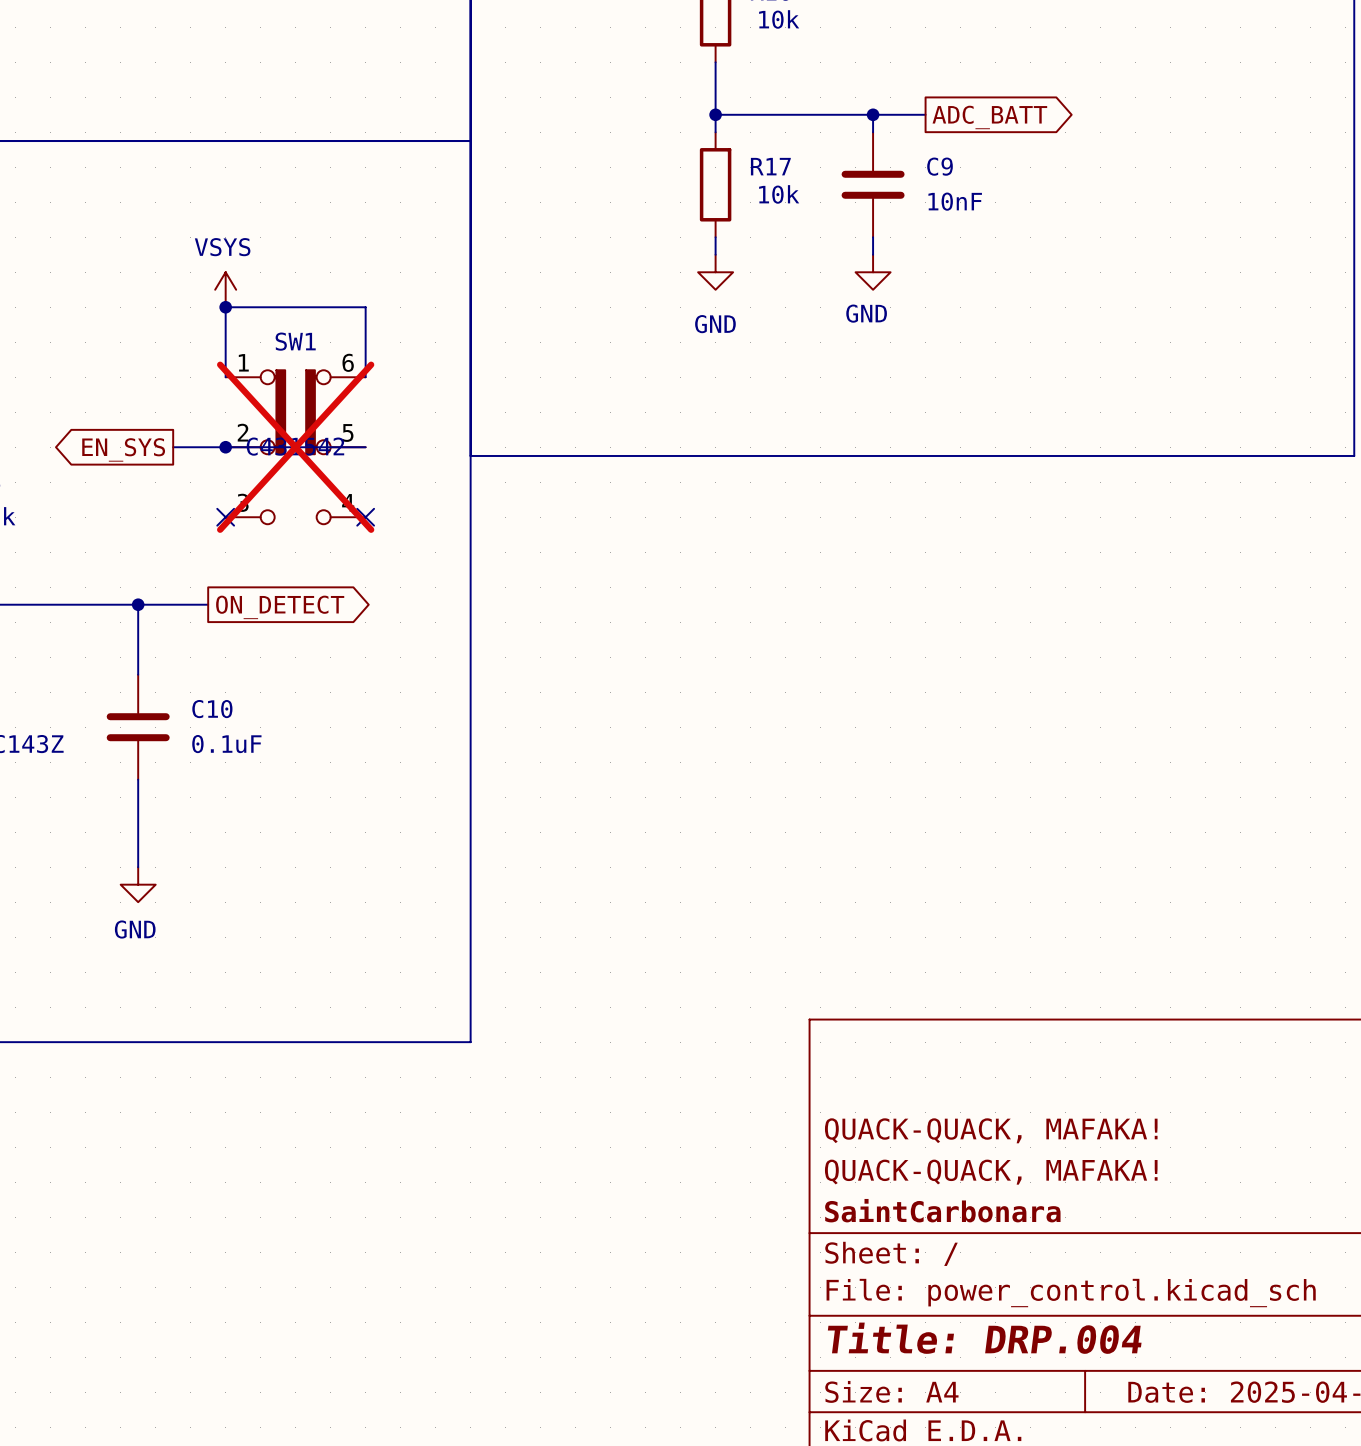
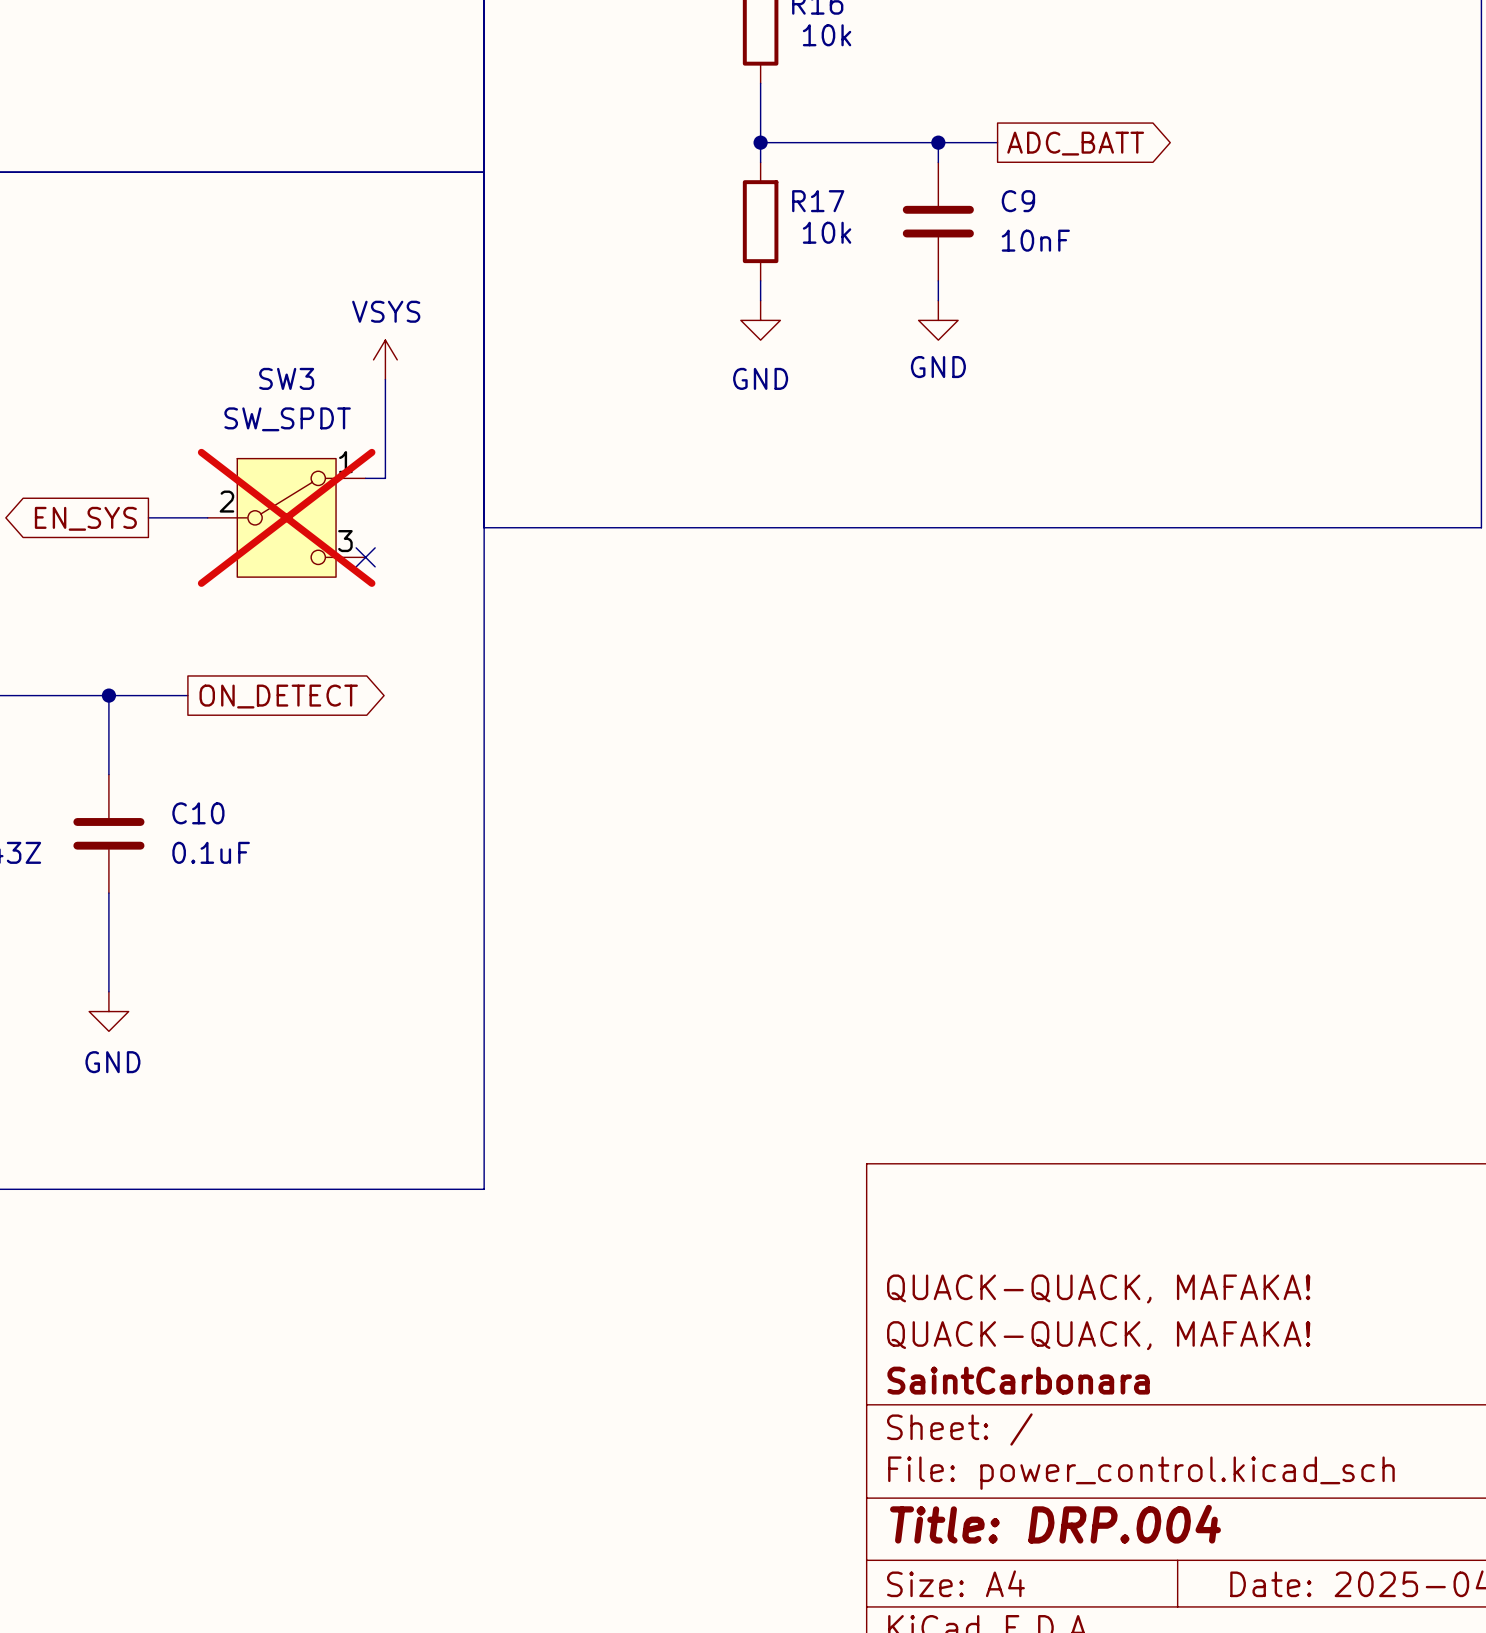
power symbol position: VSYS (225, 289) -> VSYS (385, 359)
junction: (225, 307) -> none
wire: none -> (385, 379) (385, 478) (365, 478)
wire: (225, 377) (225, 307) (365, 307) (365, 377) -> none
junction: (225, 447) -> none
SW1: (295, 447) -> none
SW3: none -> SW_SPDT (286, 517)
no-connect mark: (225, 517) -> none
no-connect mark position: (365, 517) -> (365, 557)

